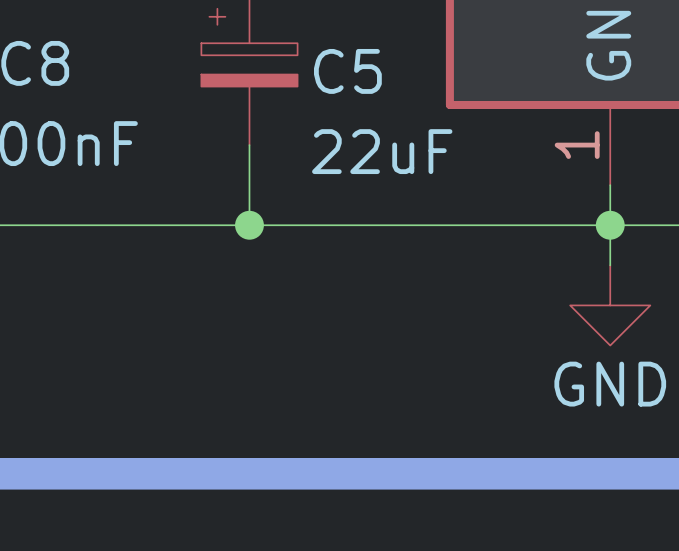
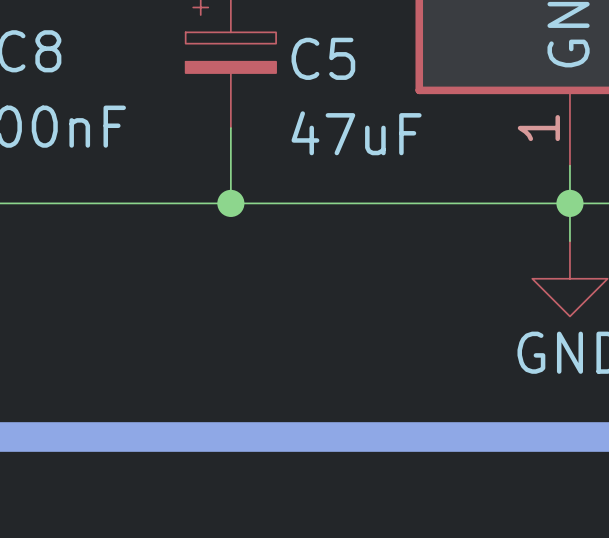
C5 value: 22uF (382, 151) -> 47uF (356, 133)

